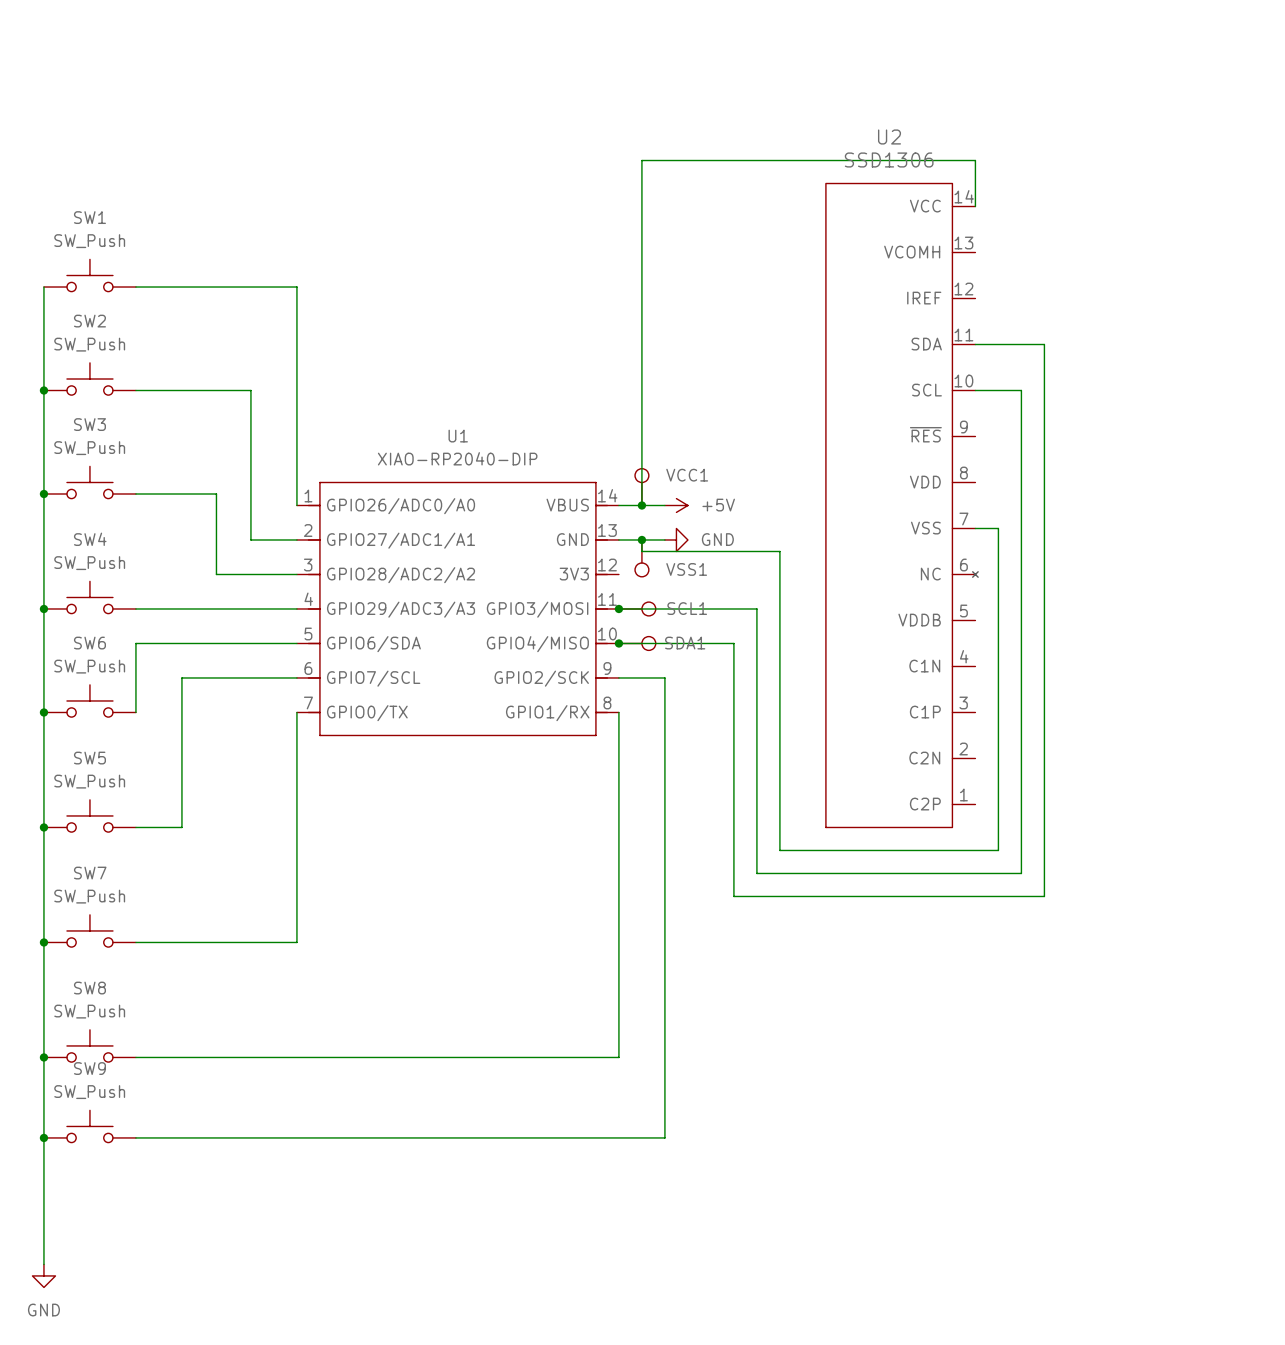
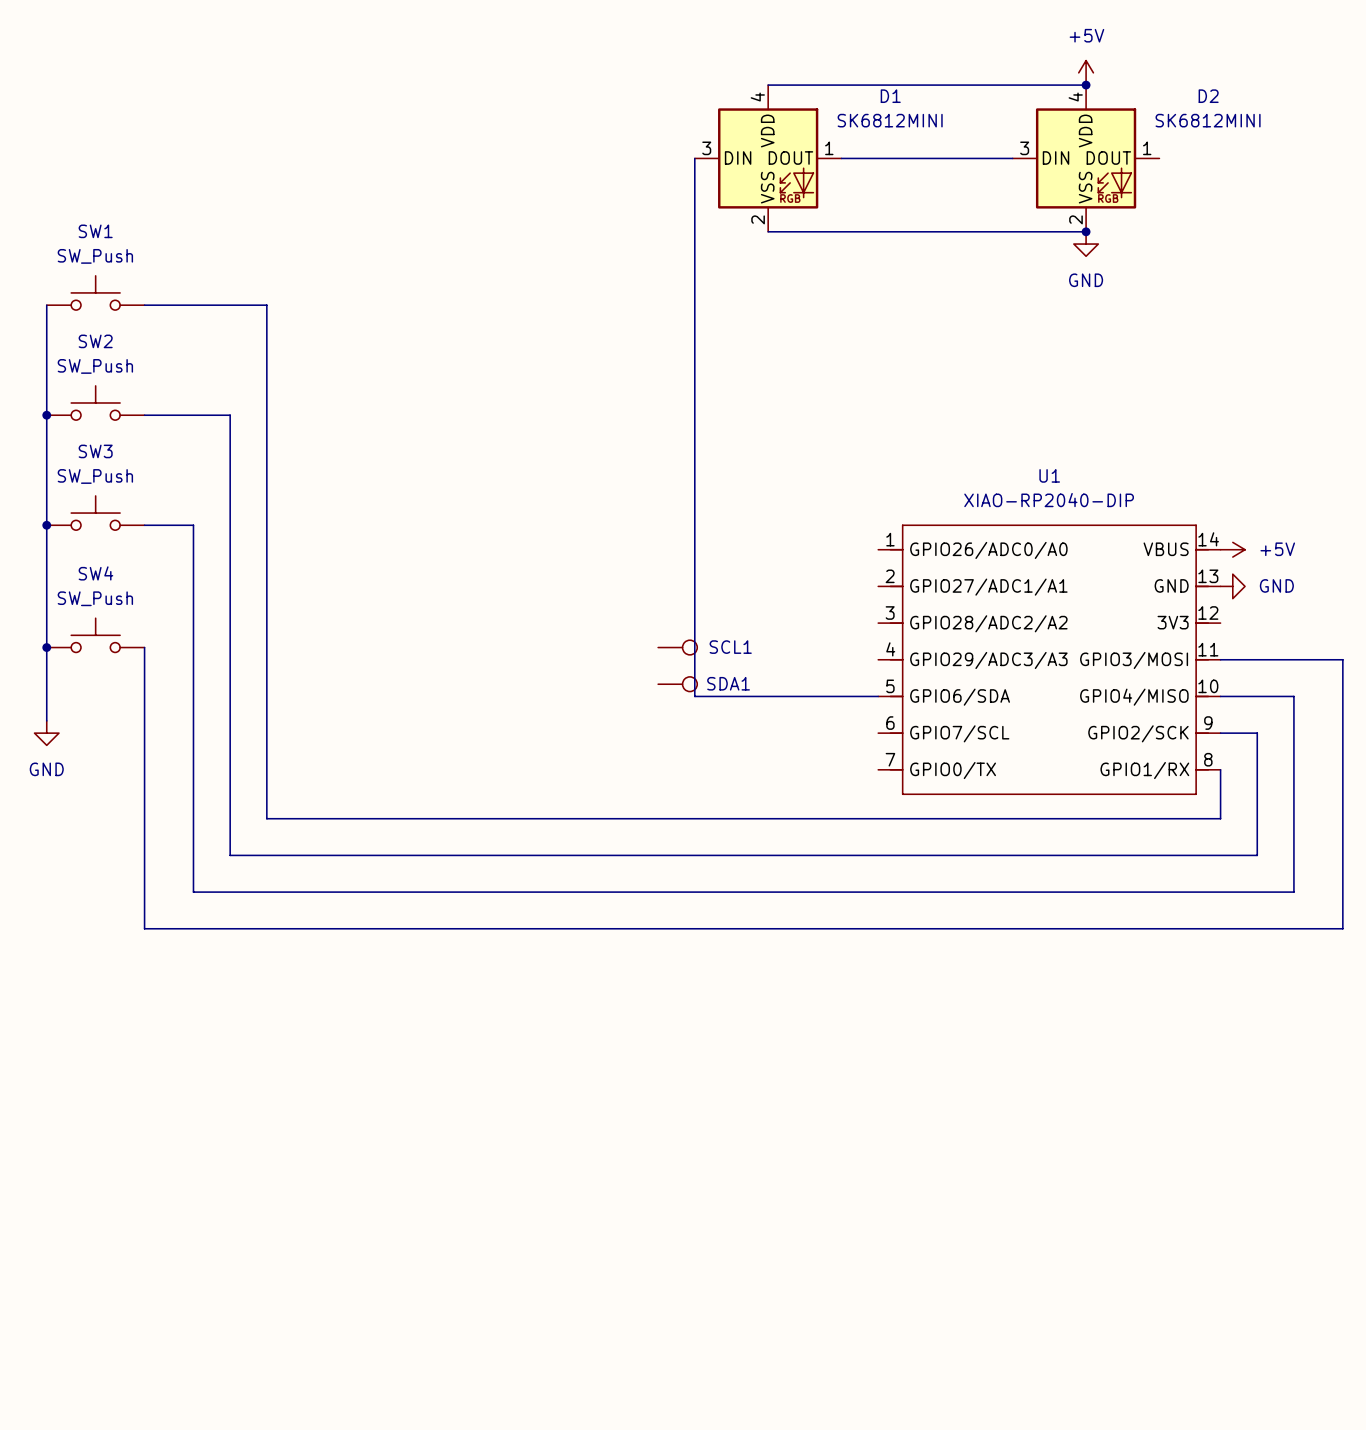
power symbol: none -> +5V (1086, 72)
wire: none -> (768, 85) (1086, 85)
junction: none -> (1086, 85)
wire: none -> (694, 158) (694, 696) (878, 696)
D1: none -> SK6812MINI (768, 158)
wire: none -> (841, 158) (1012, 158)
D2: none -> SK6812MINI (1086, 158)
wire: (975, 206) (975, 160) (641, 160) (641, 505) -> none
wire: none -> (768, 231) (1086, 231)
junction: none -> (1086, 231)
power symbol: none -> GND (1086, 244)
wire: (250, 287) (296, 287) (296, 505) -> none
wire: (975, 344) (1044, 344) (1044, 896) (733, 896) (733, 643) (618, 643) -> none
wire: (216, 390) (250, 390) -> (266, 305) (266, 415)
wire: (975, 390) (1021, 390) (1021, 873) -> (1220, 659) (1342, 659) (1342, 928) (1086, 928)
VCC1: (641, 487) -> none
wire: (181, 493) (216, 493) -> (230, 415) (230, 525)
wire: (618, 505) (664, 505) -> none
junction: (641, 505) -> none
power symbol: +5V (676, 505) -> none
U2: SSD1306 (902, 505) -> none
power symbol: none -> +5V (1232, 549)
wire: (975, 528) (998, 528) (998, 850) (779, 850) (779, 551) (641, 551) (641, 539) -> none
wire: (250, 539) (296, 539) -> (266, 574) (266, 818) (1220, 818) (1220, 769)
wire: (618, 539) (664, 539) -> none
junction: (641, 539) -> none
power symbol: GND (676, 539) -> none
power symbol: none -> GND (1232, 586)
VSS1: (641, 558) -> none
wire: (216, 574) (296, 574) -> (230, 610) (230, 855) (1257, 855) (1257, 733) (1220, 733)
wire: (135, 608) (296, 608) -> (144, 647) (144, 684)
U1 position: (457, 608) -> (1049, 659)
wire: (618, 608) (756, 608) (756, 873) -> (144, 757) (144, 928) (804, 928)
junction: (618, 608) -> none
wire: (135, 643) (296, 643) -> none
junction: (618, 643) -> none
wire: (43, 677) (43, 1264) -> none
wire: (181, 677) (296, 677) -> (193, 720) (193, 525)
wire: (618, 677) (664, 677) (664, 1137) (135, 1137) -> none
power symbol: none -> GND (46, 733)
SW6: SW_Push (89, 700) -> none
junction: (43, 712) -> none
wire: (296, 712) (296, 942) (135, 942) -> none
wire: (618, 712) (618, 1057) (135, 1057) -> none
SW5: SW_Push (89, 815) -> none
junction: (43, 827) -> none
wire: (135, 827) (181, 827) -> (1220, 696) (1293, 696) (1293, 892) (193, 892) (193, 879)
SW7: SW_Push (89, 930) -> none
junction: (43, 942) -> none
SW8: SW_Push (89, 1045) -> none
junction: (43, 1057) -> none
SW9: SW_Push (89, 1126) -> none
junction: (43, 1137) -> none
power symbol: GND (43, 1275) -> none

